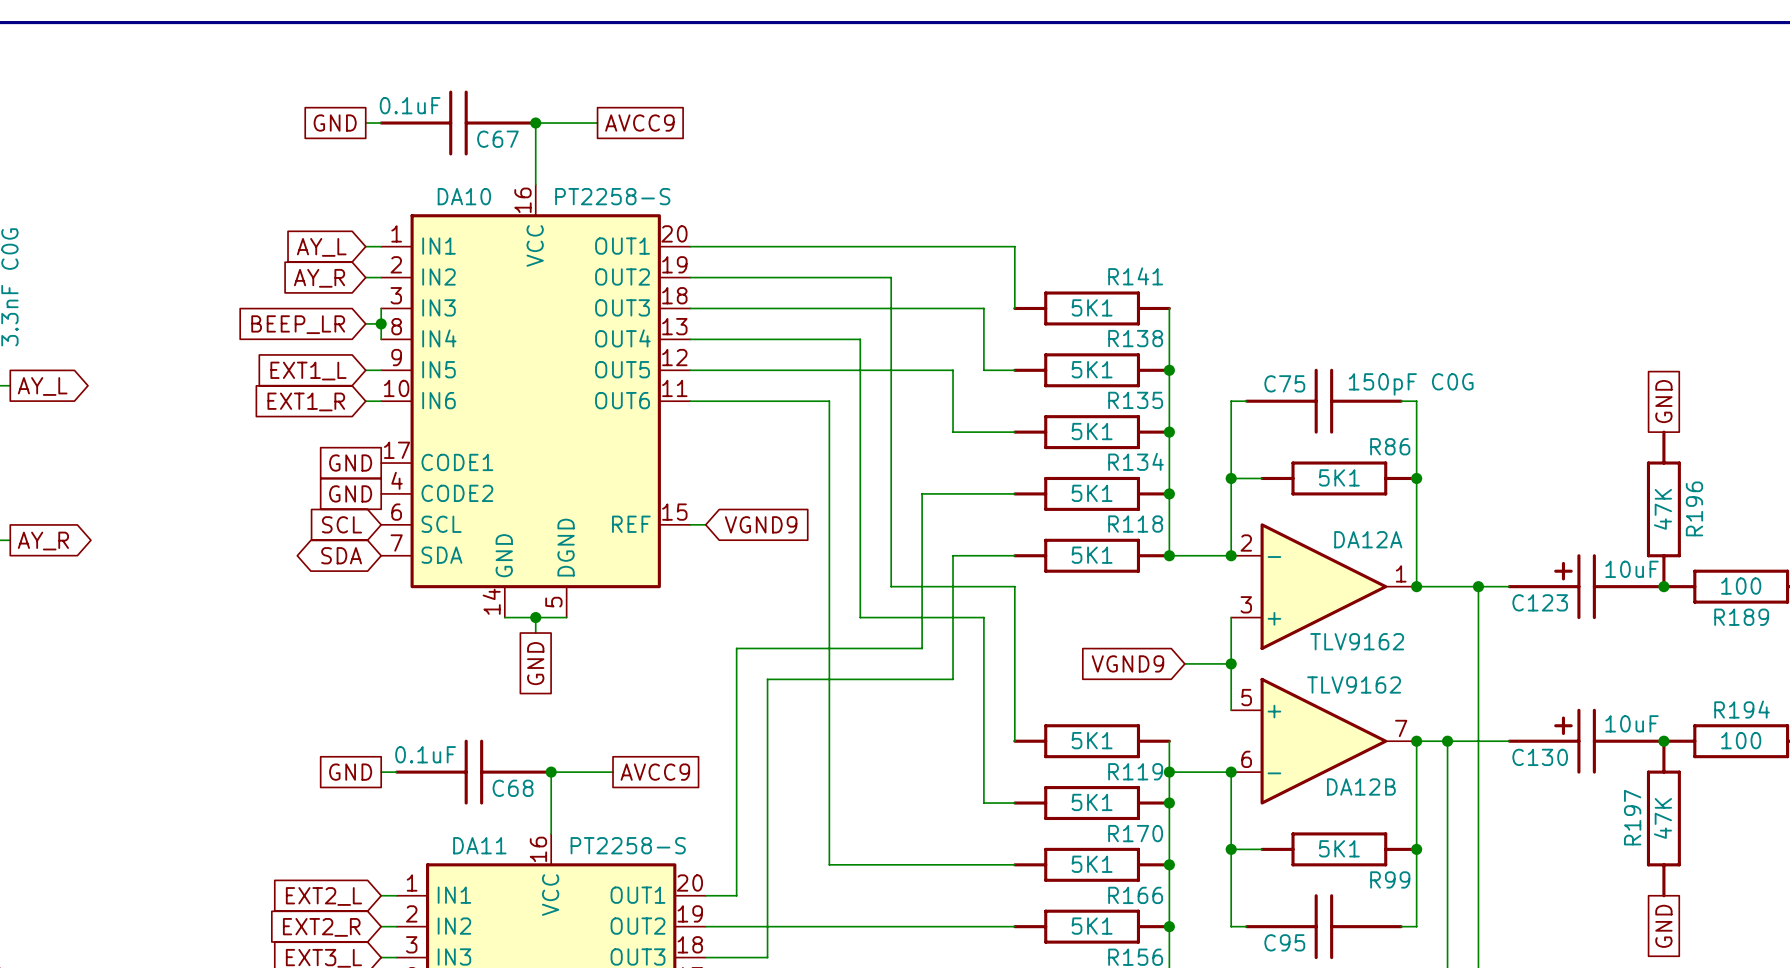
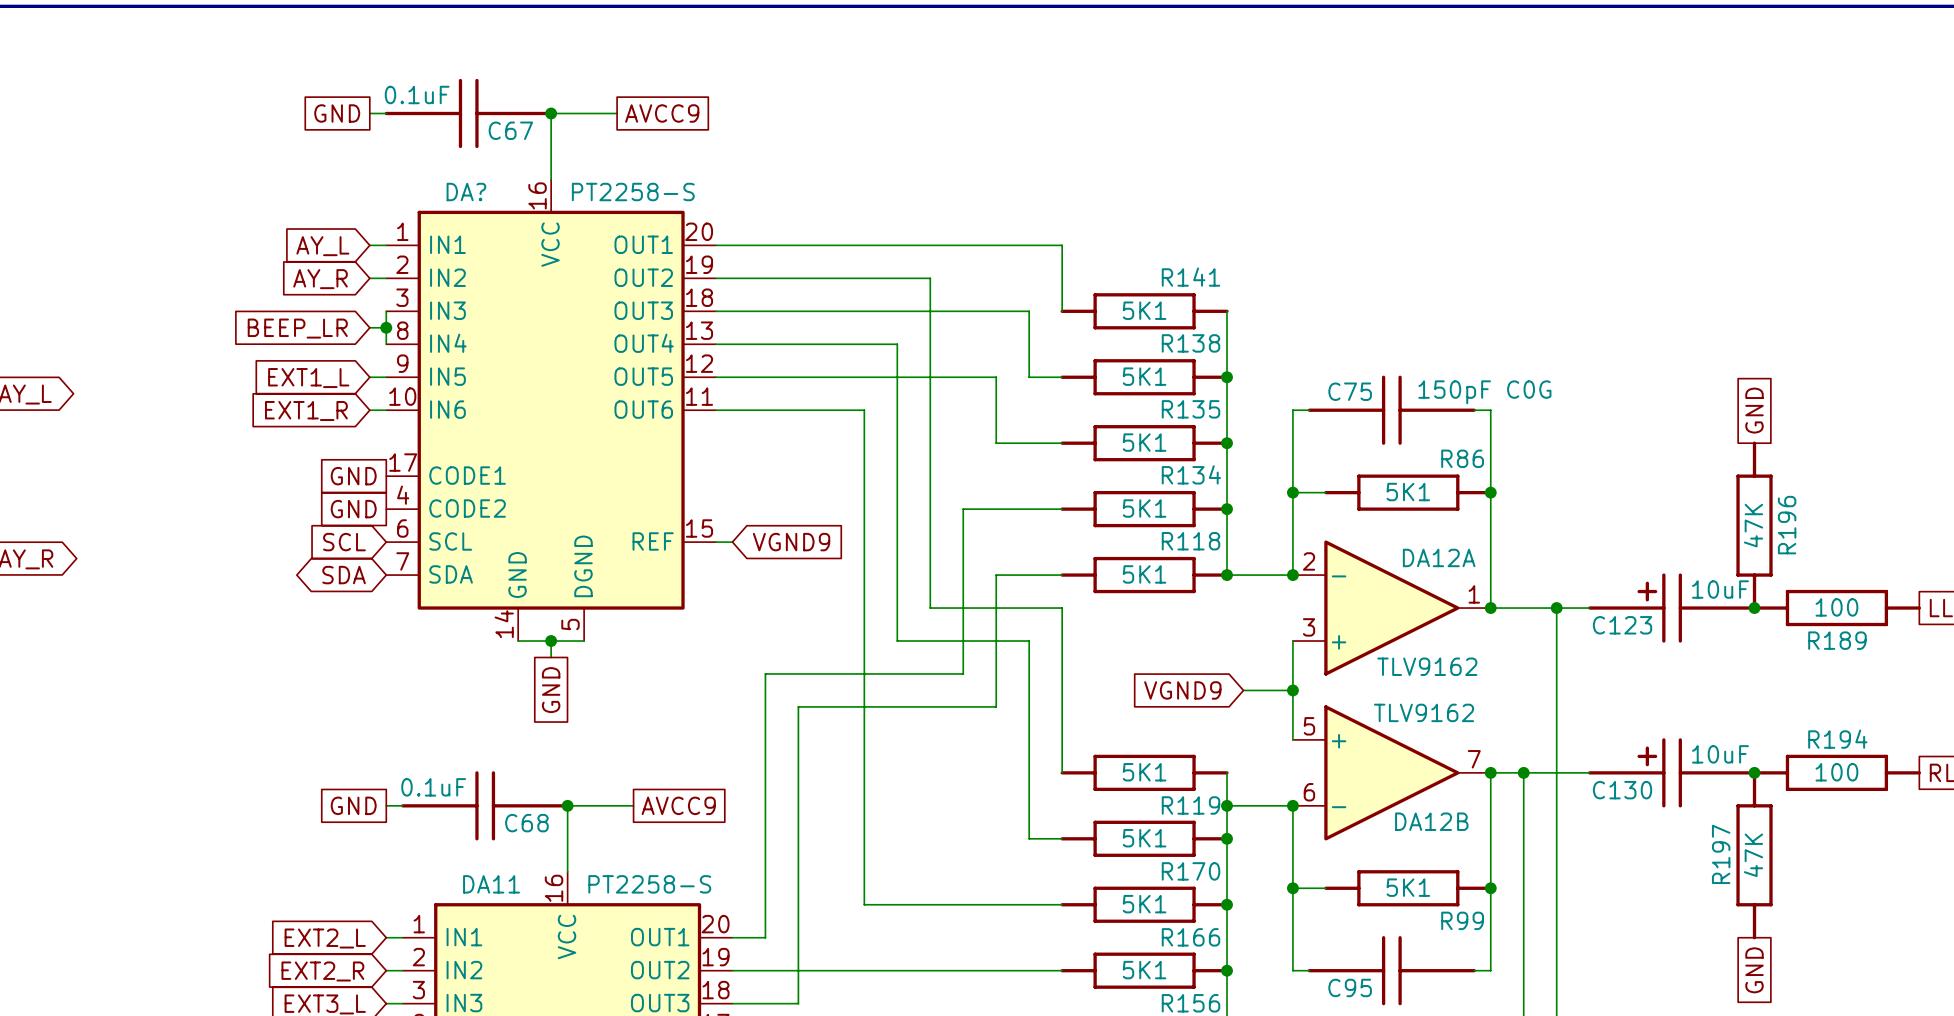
DA10 name: DA10 (464, 196) -> DA? (466, 192)

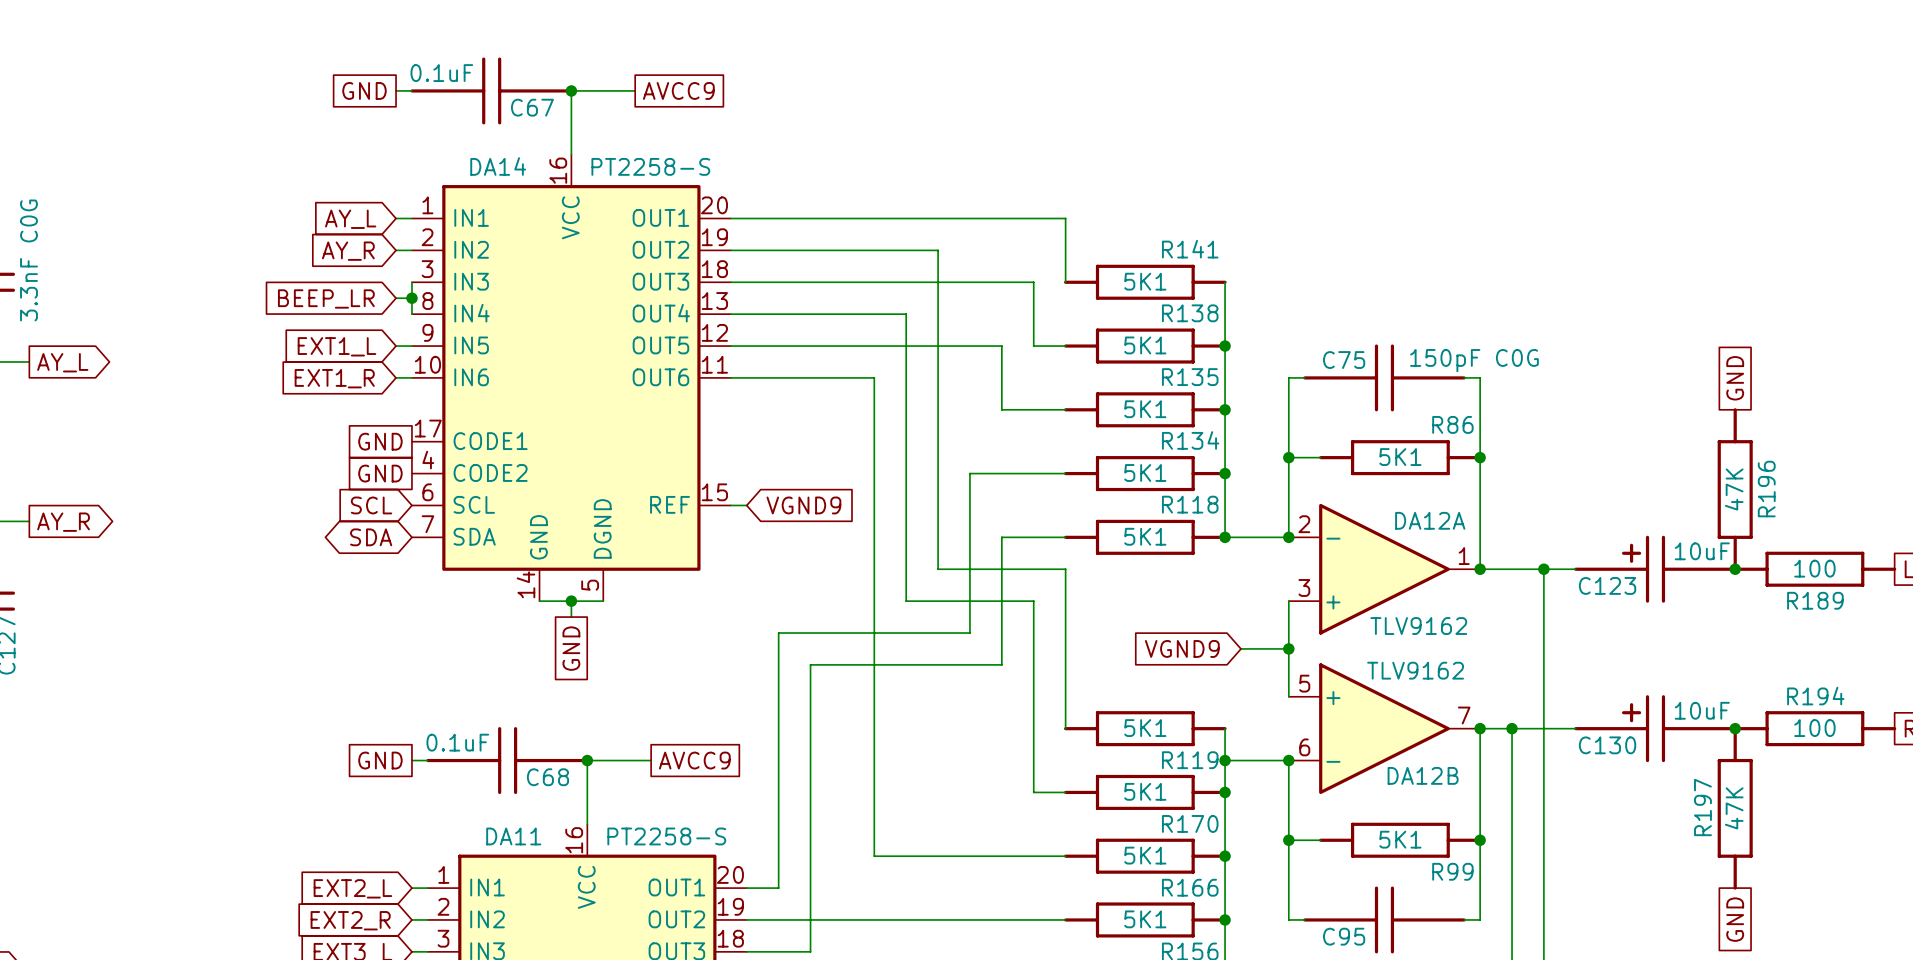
DA? name: DA? (466, 192) -> DA14 (498, 166)

